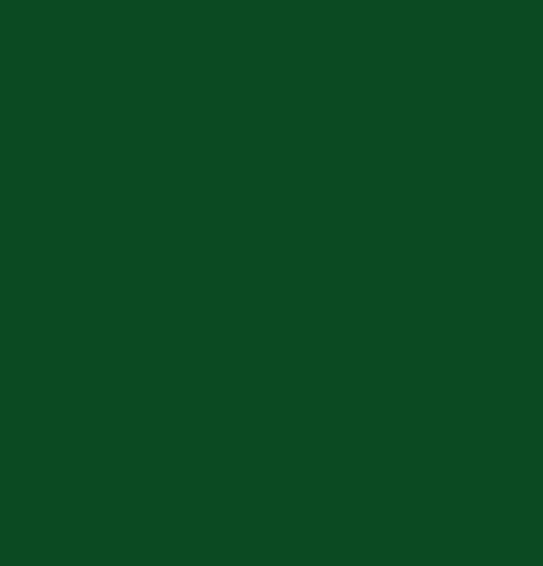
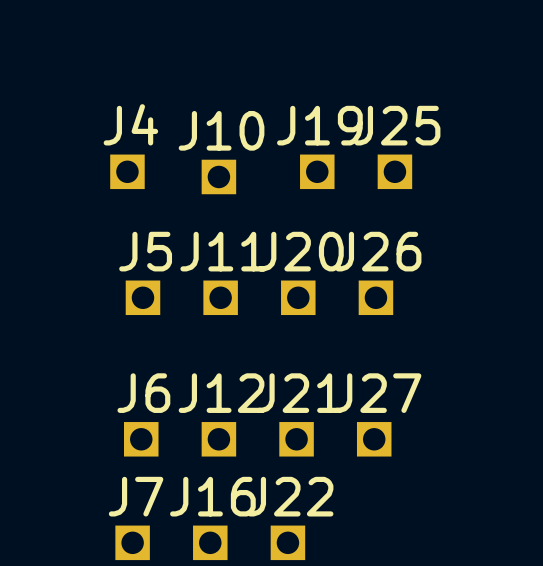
J4: none -> (127, 171)
J19: none -> (317, 171)
J25: none -> (394, 171)
J10: none -> (218, 176)
J5: none -> (142, 297)
J11: none -> (220, 297)
J20: none -> (298, 297)
J26: none -> (375, 297)
J6: none -> (141, 439)
J12: none -> (218, 439)
J21: none -> (296, 439)
J27: none -> (374, 439)
J7: none -> (132, 542)
J16: none -> (210, 542)
J22: none -> (287, 542)

